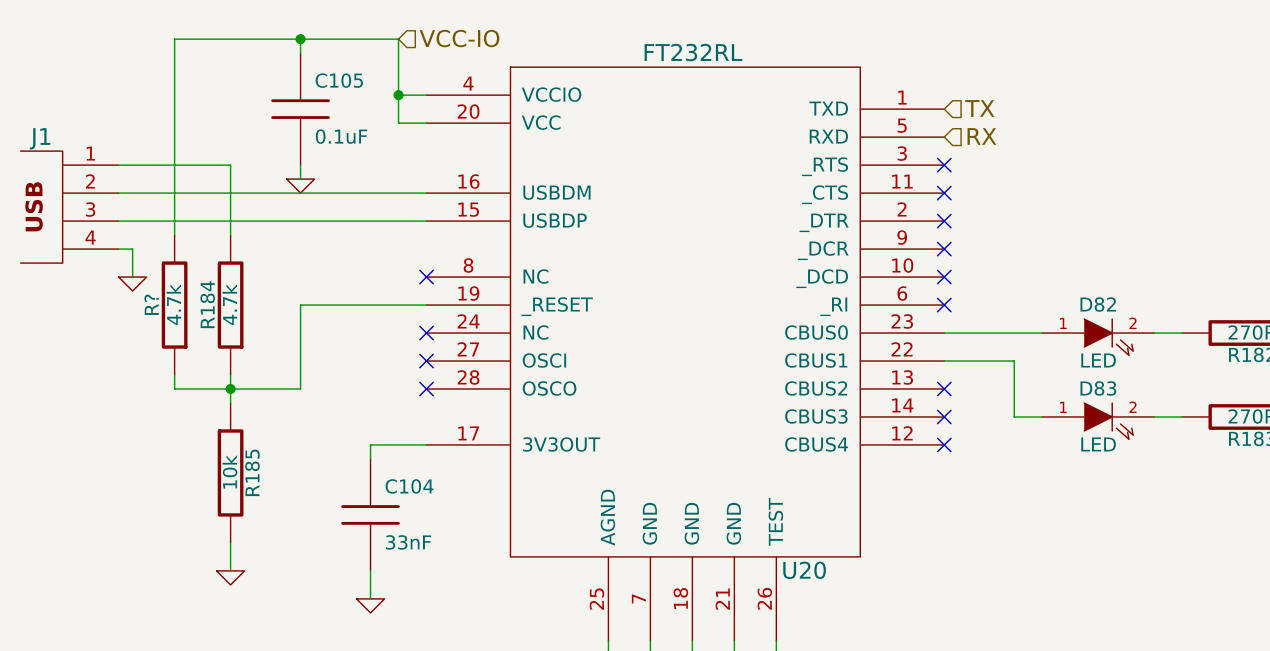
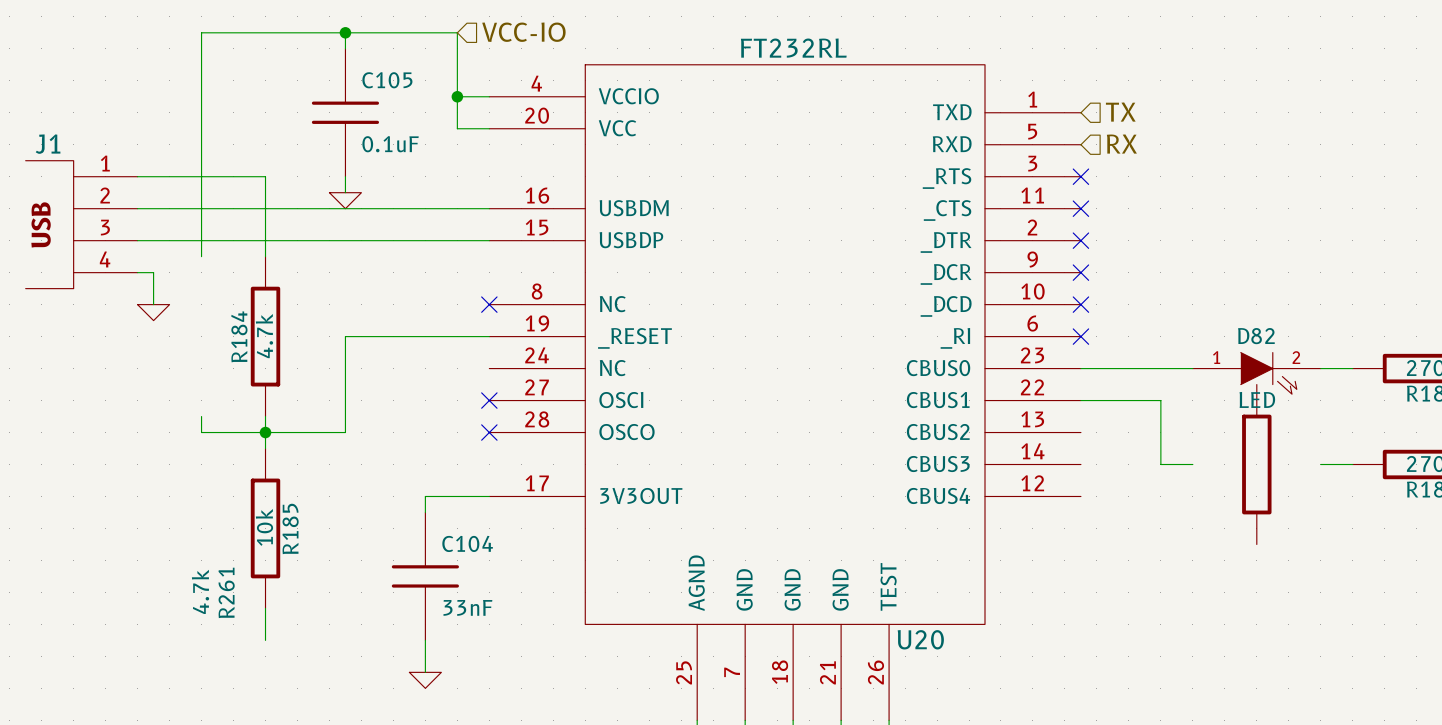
R?: 4.7k (174, 305) -> none
no-connect mark: (426, 333) -> none
no-connect mark: (944, 389) -> none
no-connect mark: (944, 416) -> none
R261: none -> 4.7k (1256, 464)
D83: LED (1098, 421) -> none
no-connect mark: (944, 444) -> none
power symbol: (230, 577) -> none

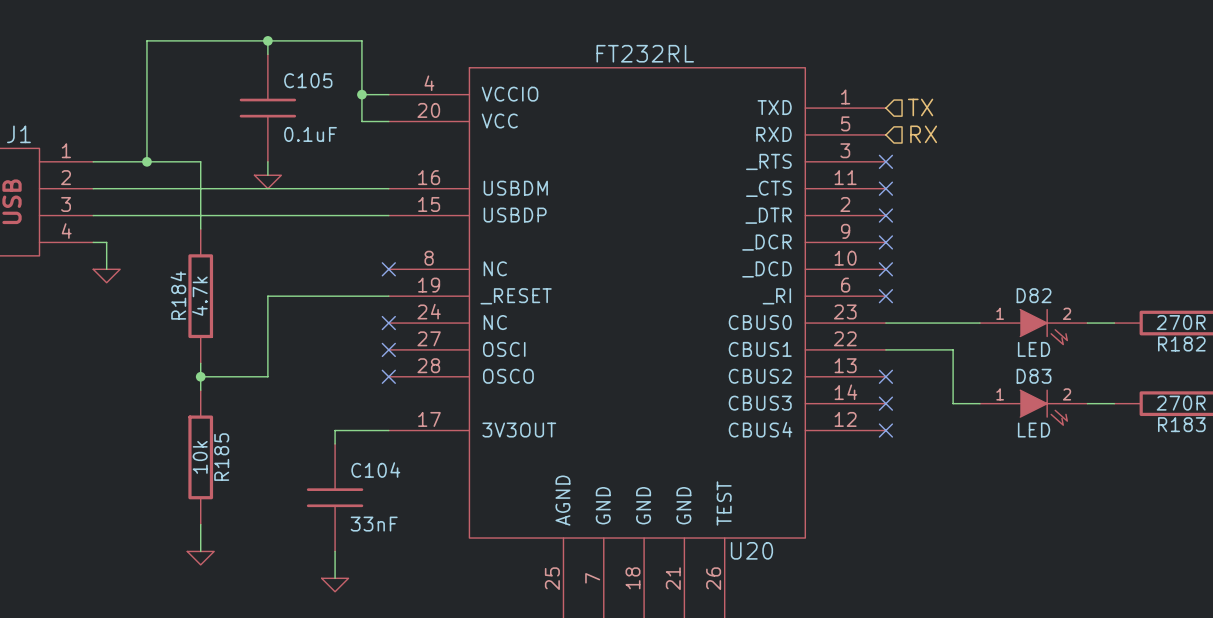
hierarchical label: VCC-IO (523, 32) -> none
wire: (201, 176) (201, 256) -> none
junction: none -> (146, 161)
no-connect mark: none -> (388, 323)
wire: (201, 416) (201, 432) (265, 432) -> none
no-connect mark: none -> (885, 376)
no-connect mark: none -> (885, 403)
R261: 4.7k (1256, 464) -> none
D83: none -> LED (1033, 407)
no-connect mark: none -> (885, 430)
power symbol: none -> (200, 558)

